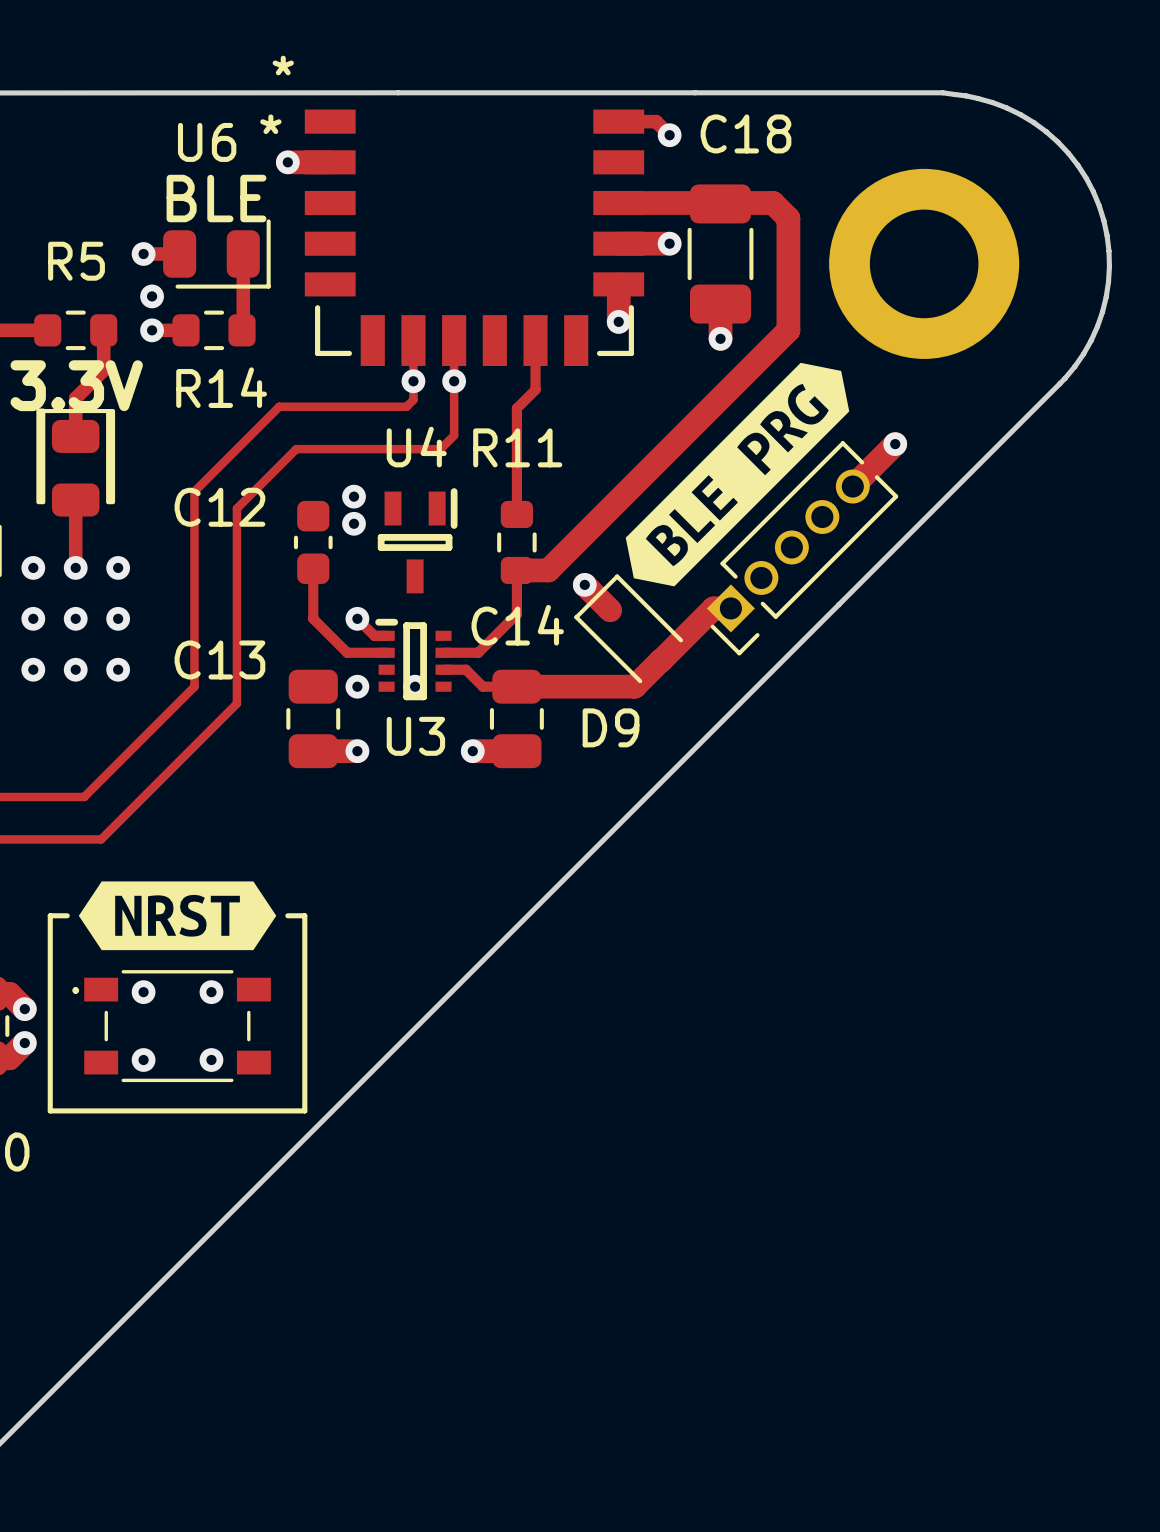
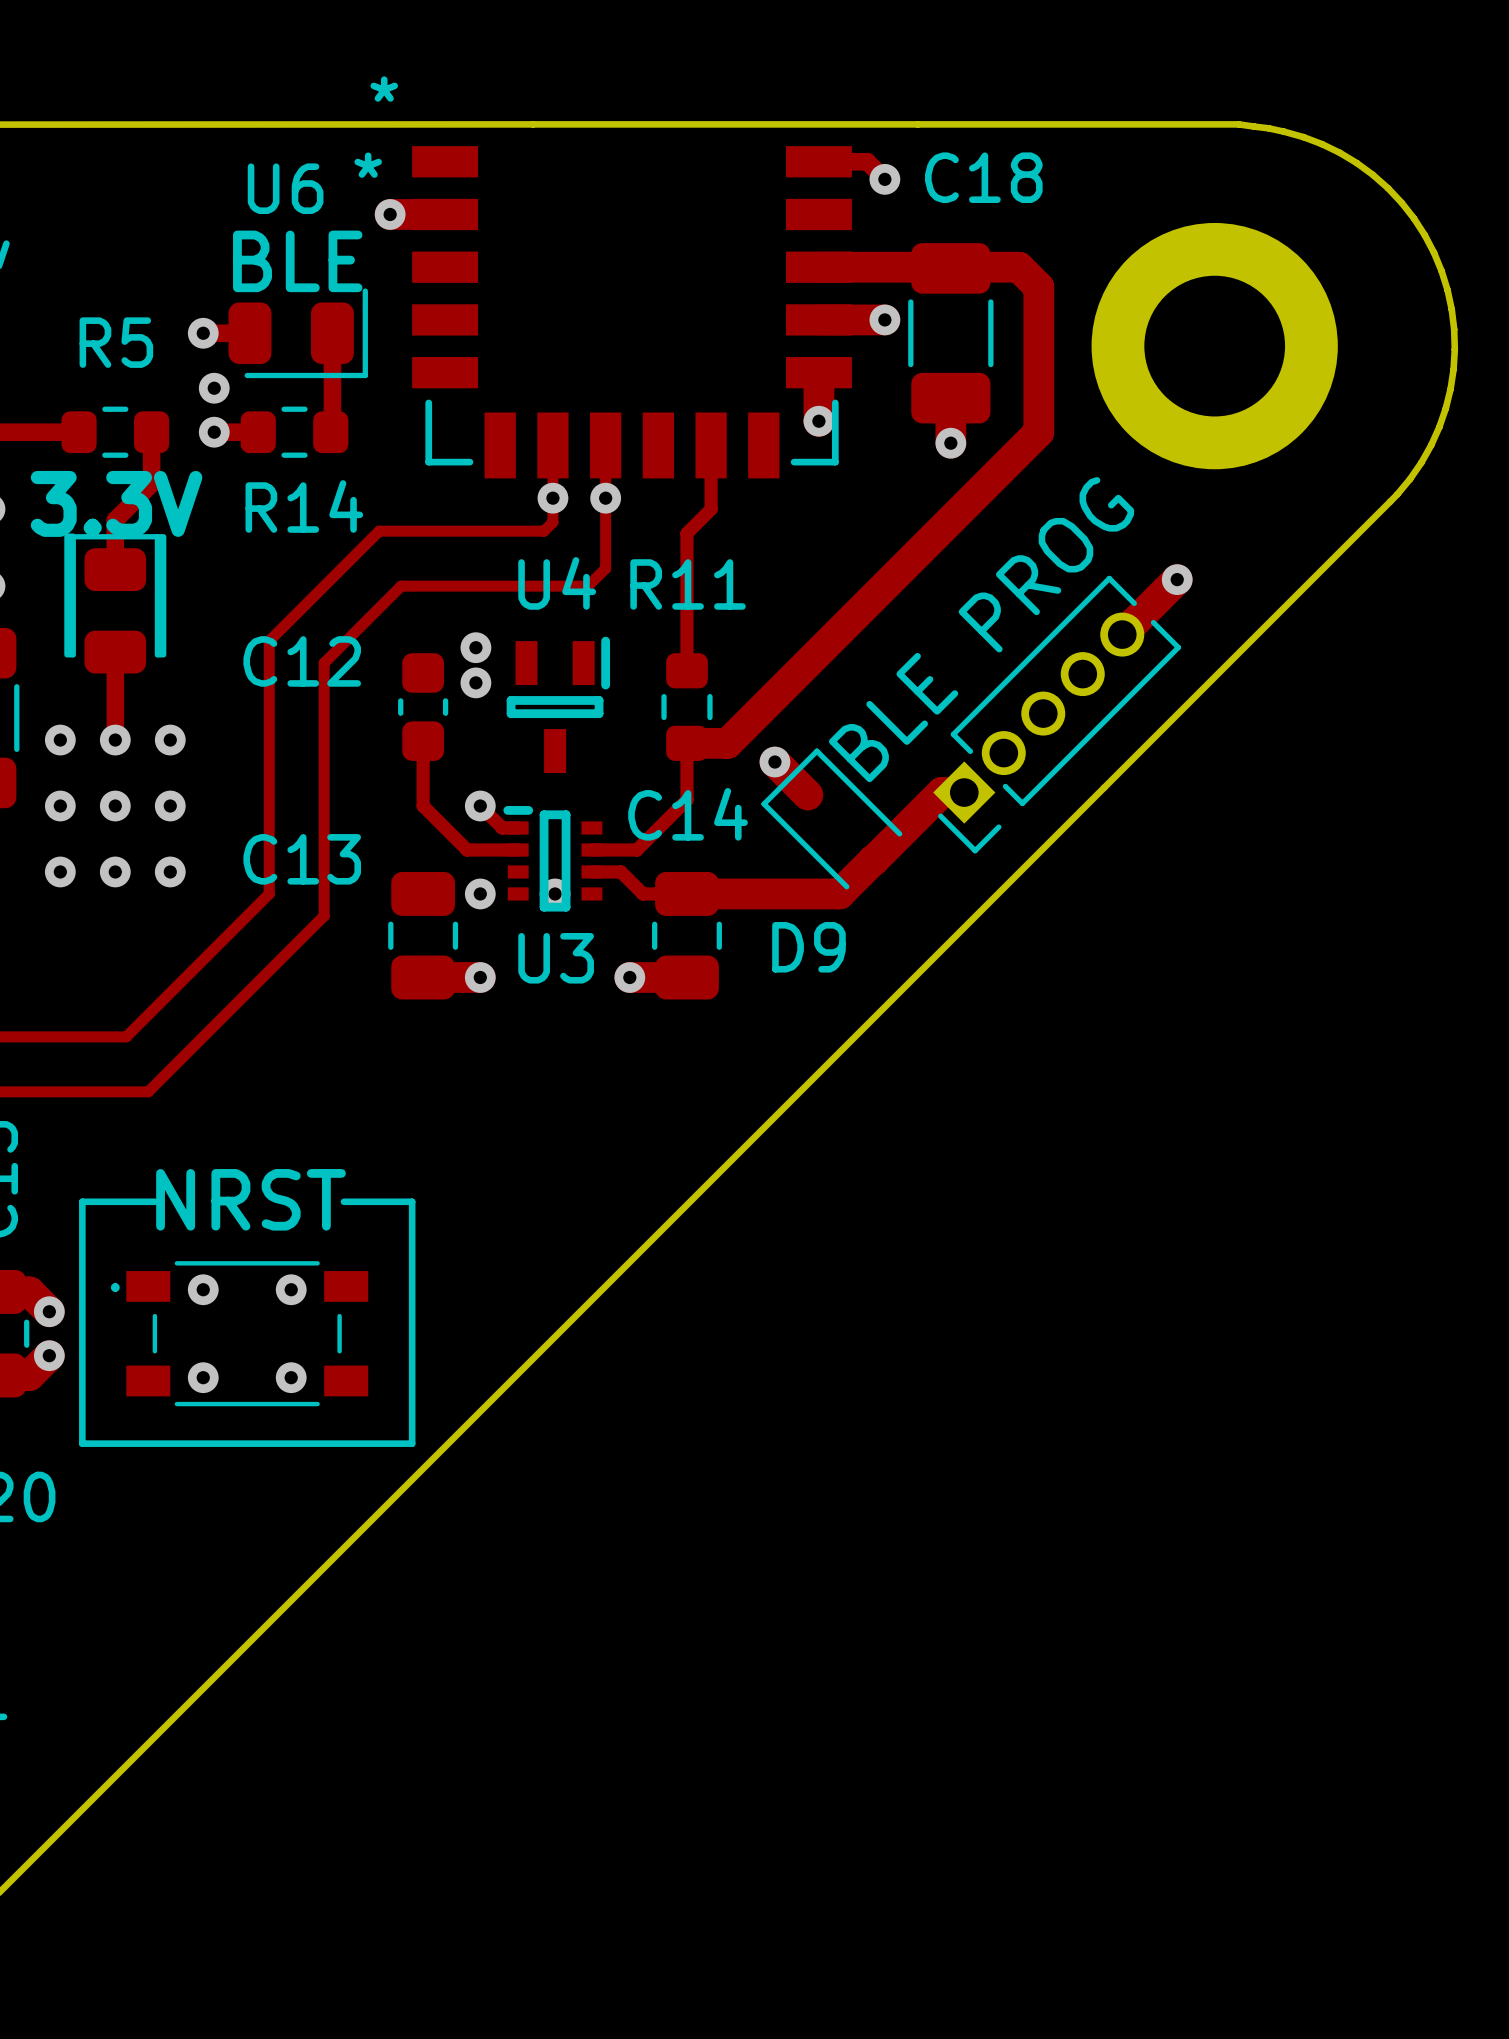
drawing: [625, 362, 850, 587] -> none
part value: none -> BLE PROG (981, 629)
drawing: [78, 881, 277, 951] -> none
line: (67, 915) (50, 915) (50, 924) -> (154, 1201) (82, 1201)
line: (287, 915) (304, 915) (304, 924) -> (343, 1201) (412, 1201)
part value: none -> NRST (251, 1199)

